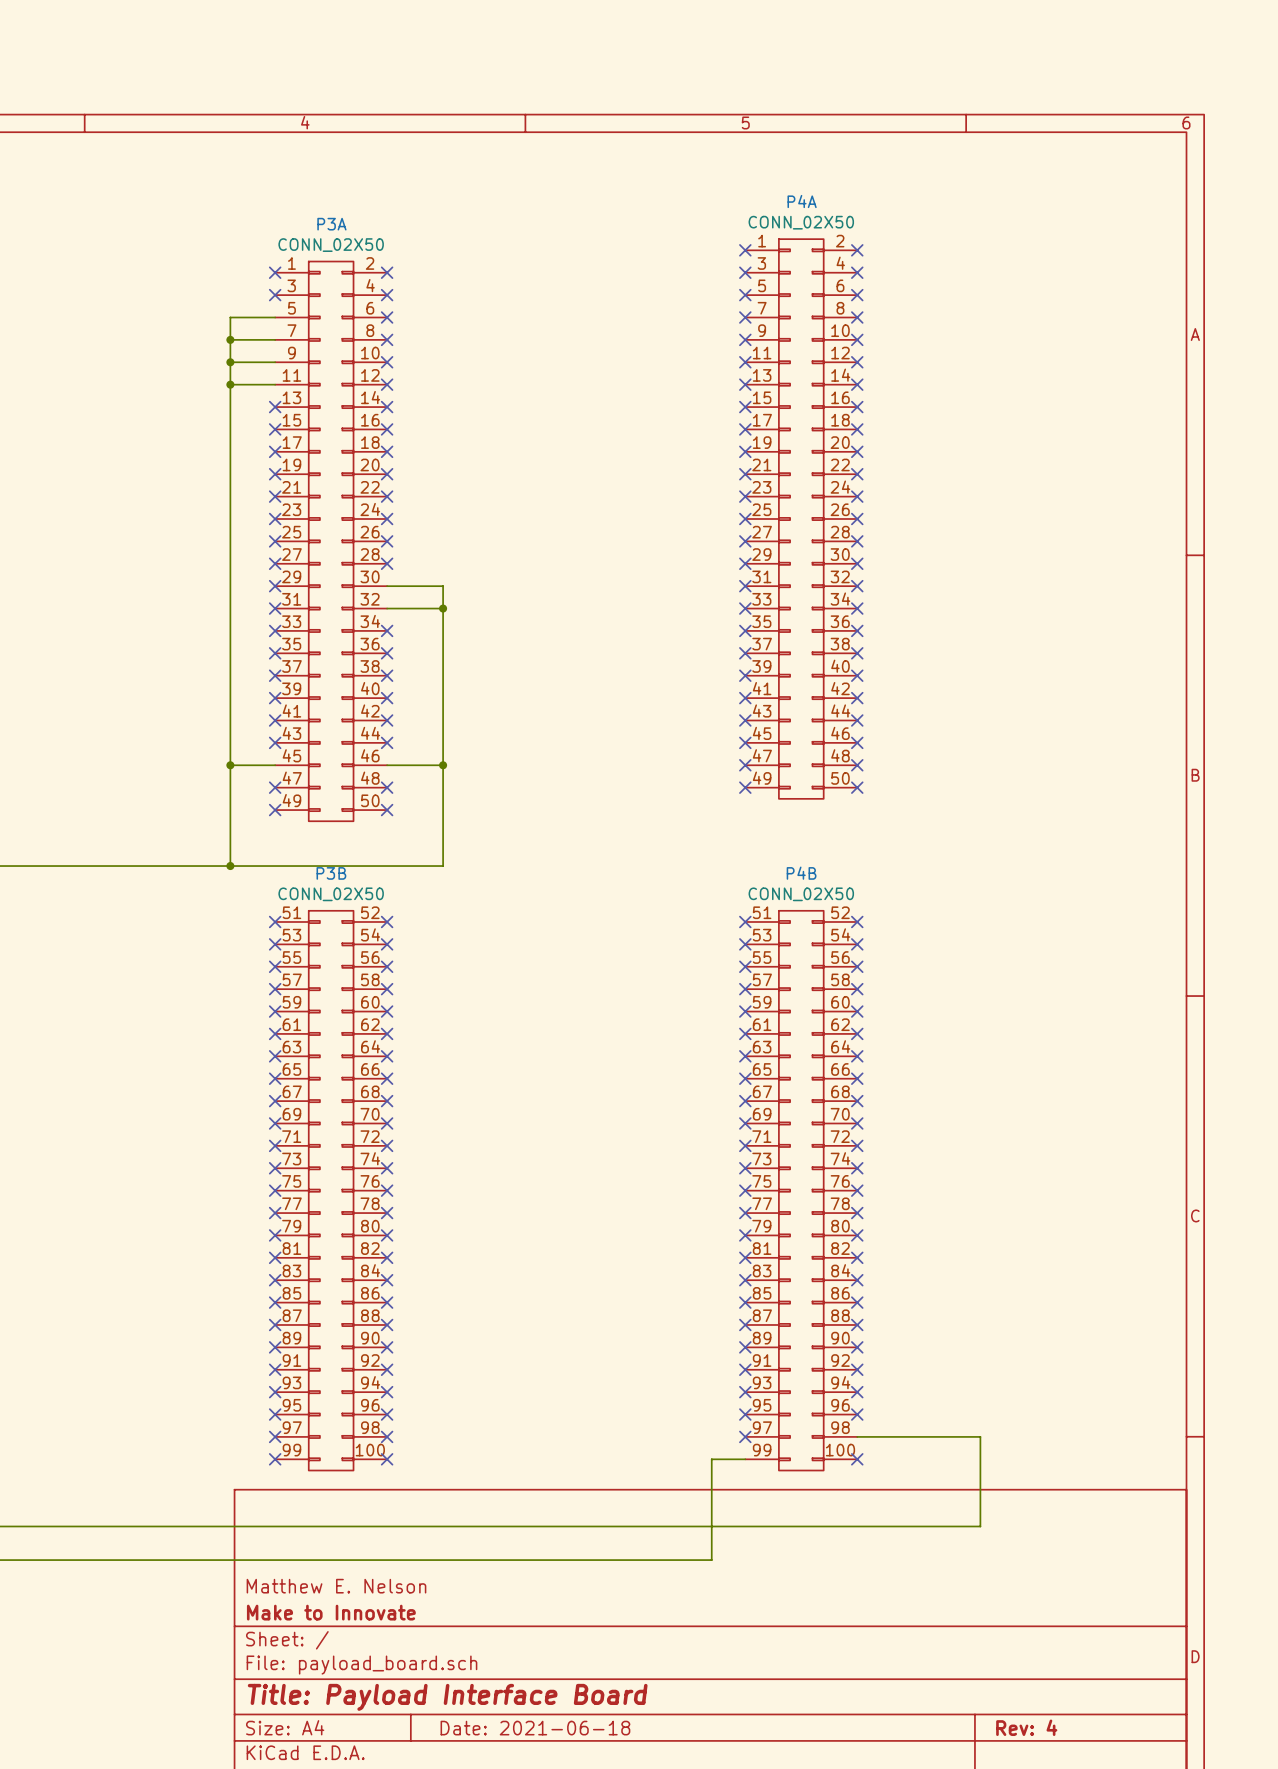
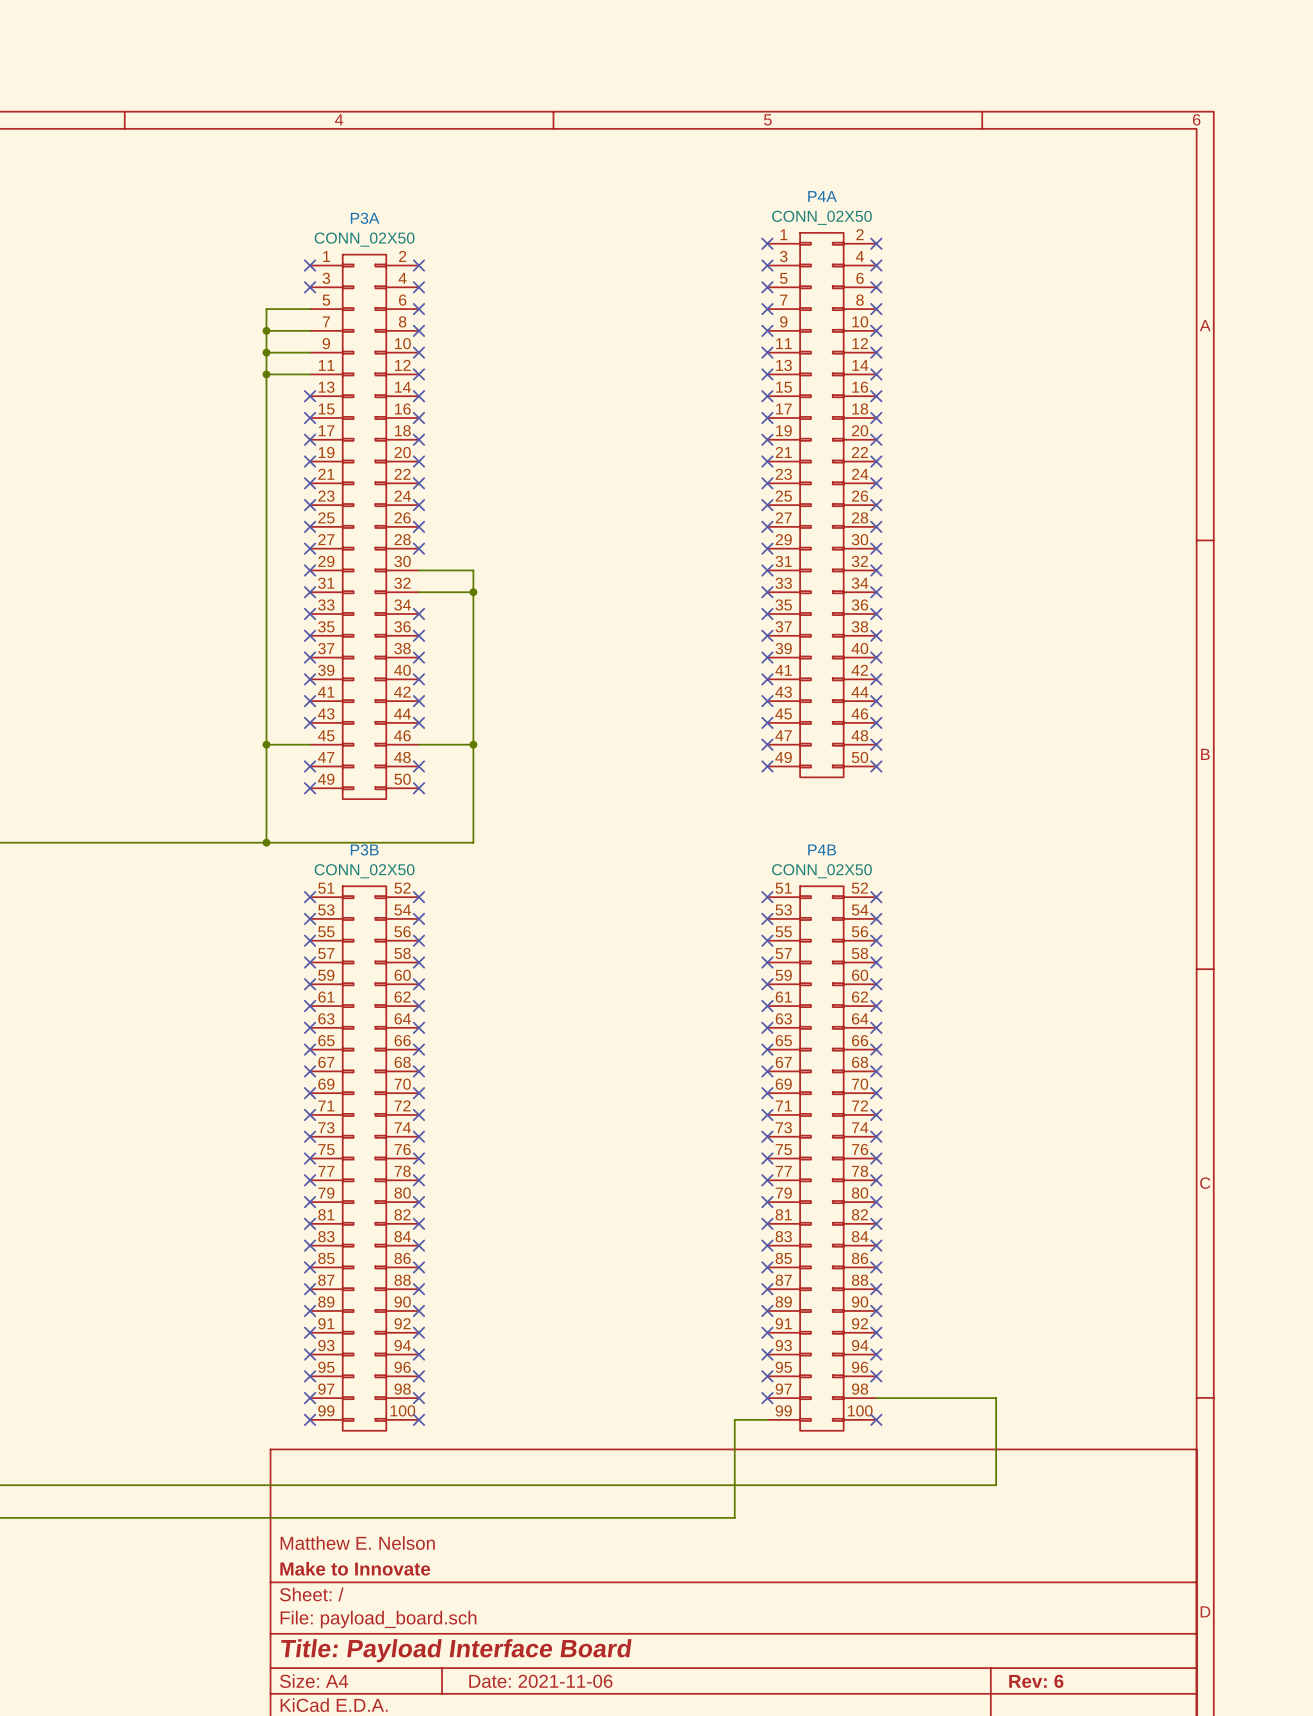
title block: Rev: 4 (1026, 1727) -> Rev: 6 (1036, 1681)
title block: Date: 2021-06-18 (535, 1728) -> Date: 2021-11-06 (540, 1681)

